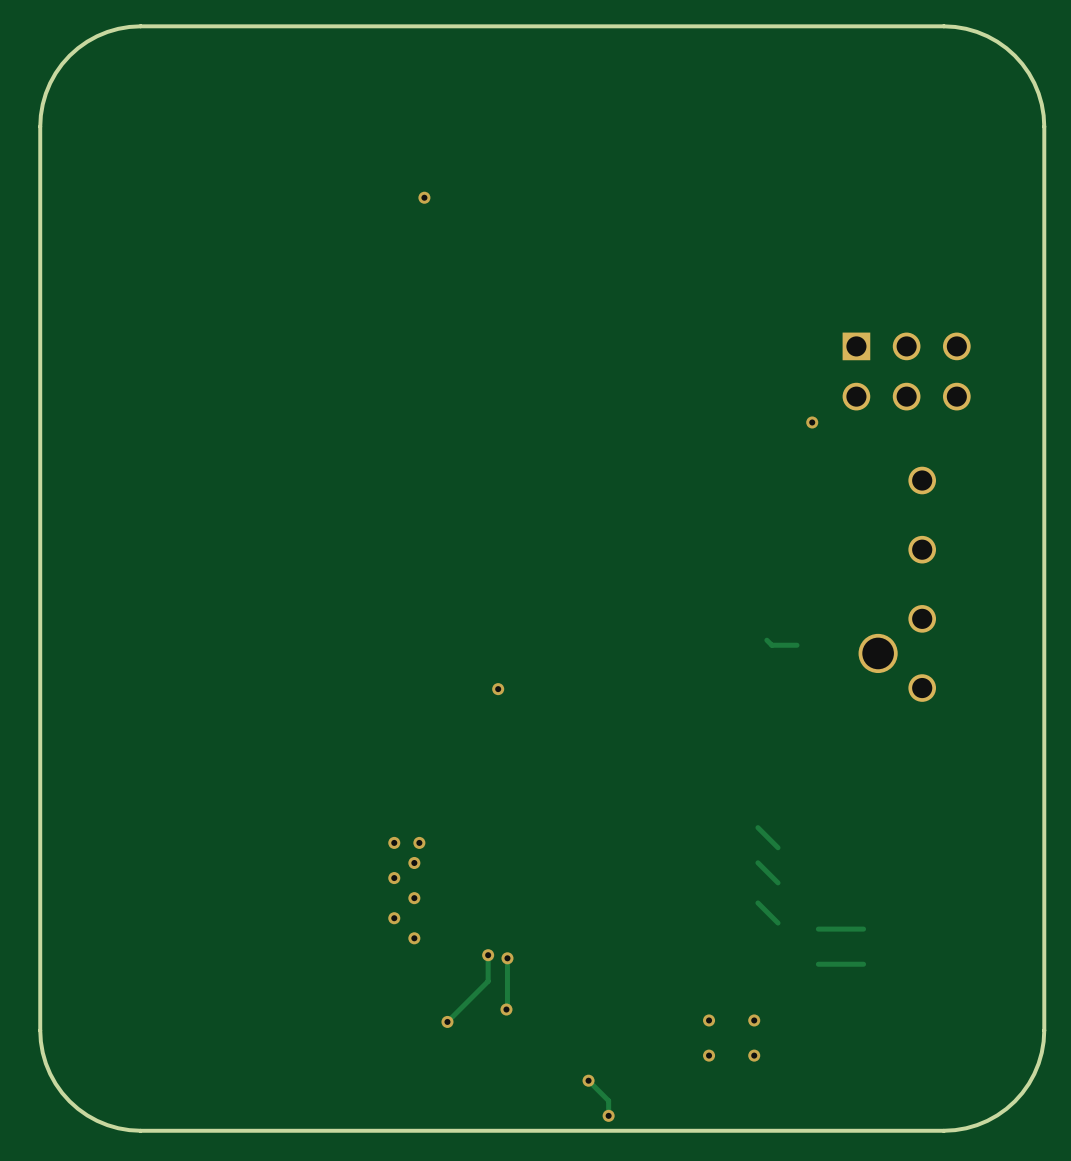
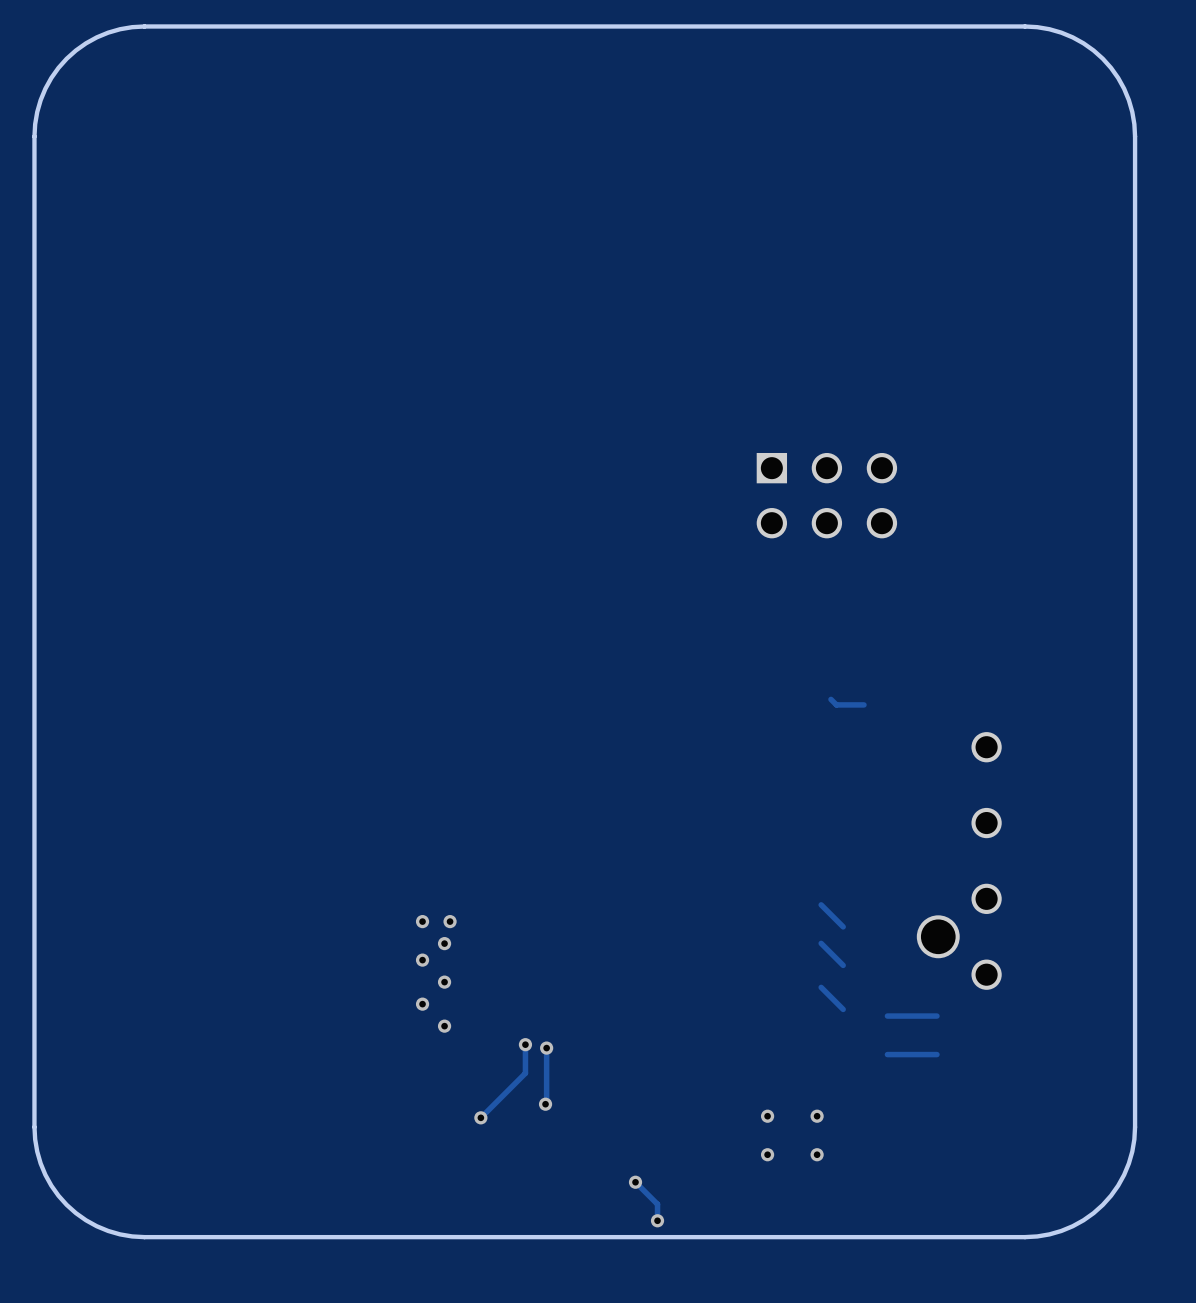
via: (424, 197) -> none
part position: (906, 371) -> (826, 495)
via: (812, 422) -> none
part position: (897, 584) -> (959, 860)
via: (498, 689) -> none

